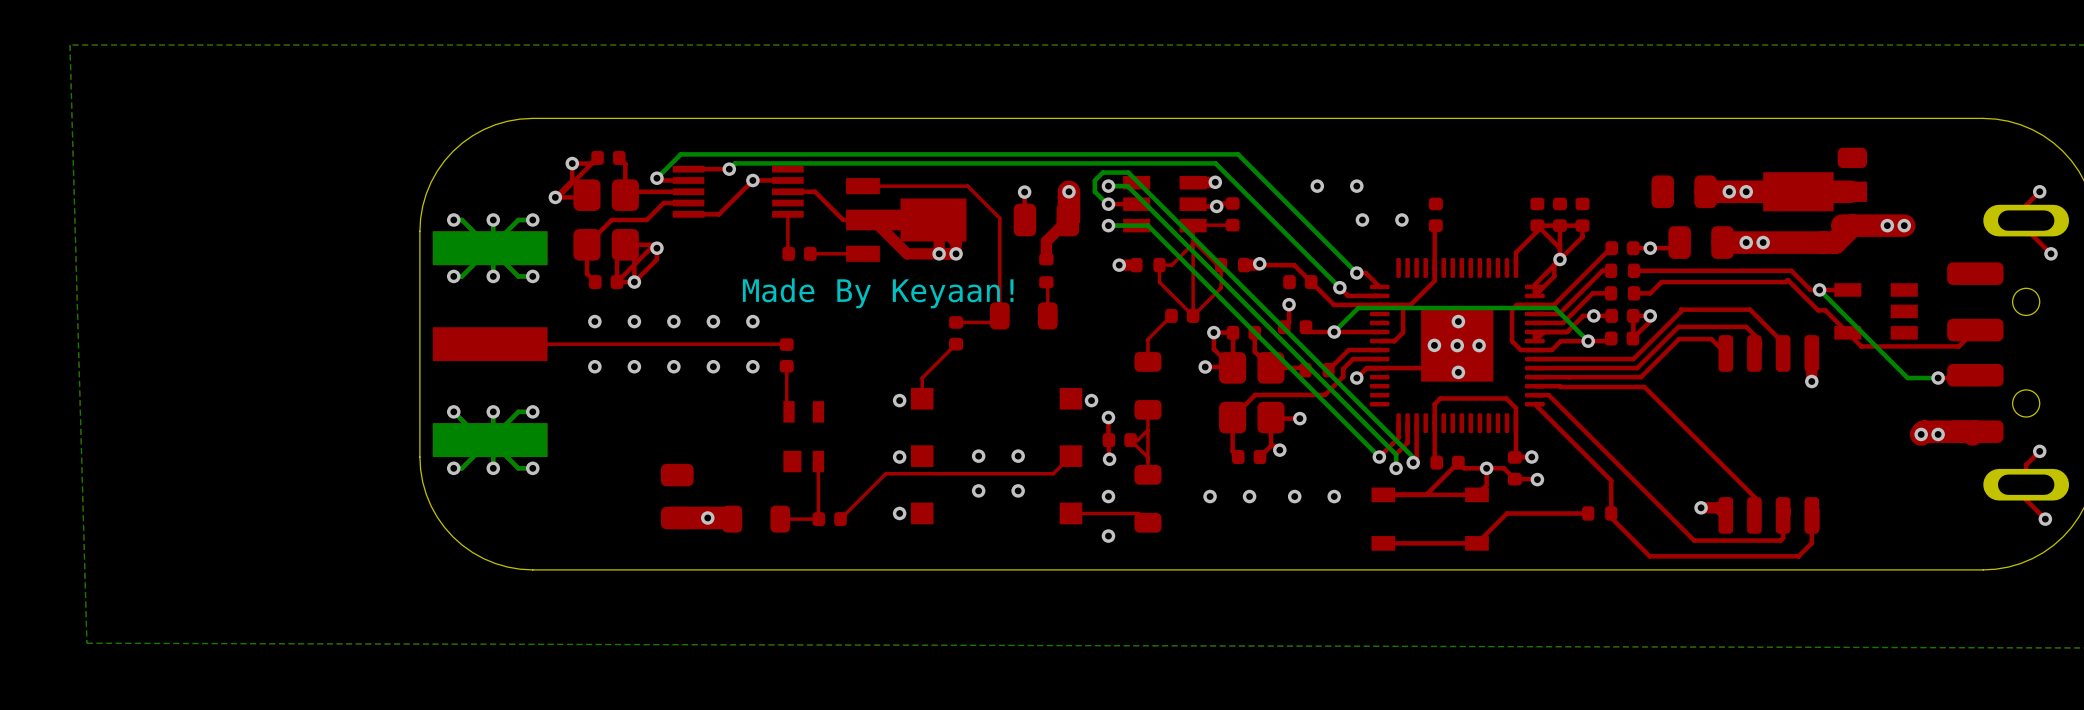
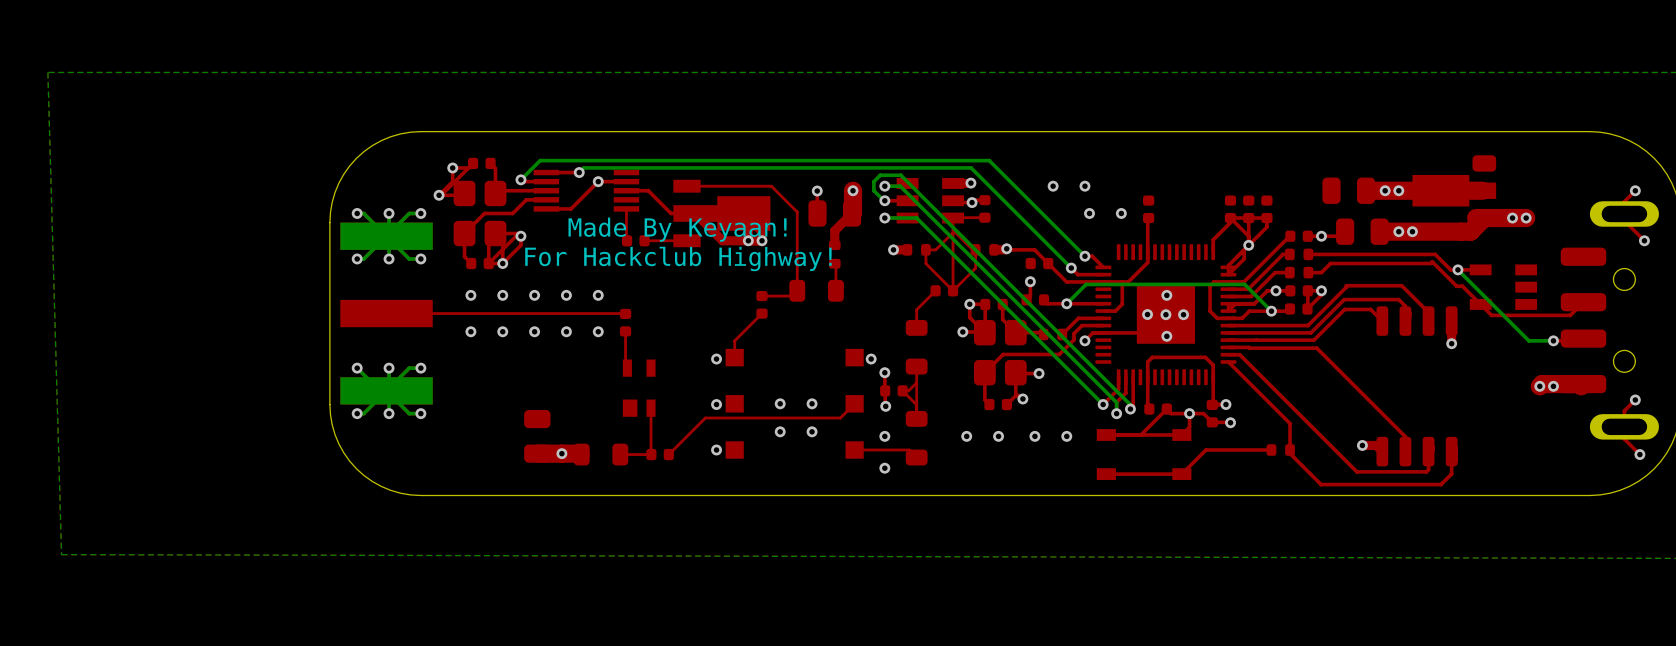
text: none -> For Hackclub Highway! (678, 258)
text position: Made By Keyaan! (878, 293) -> Made By Keyaan! (677, 229)

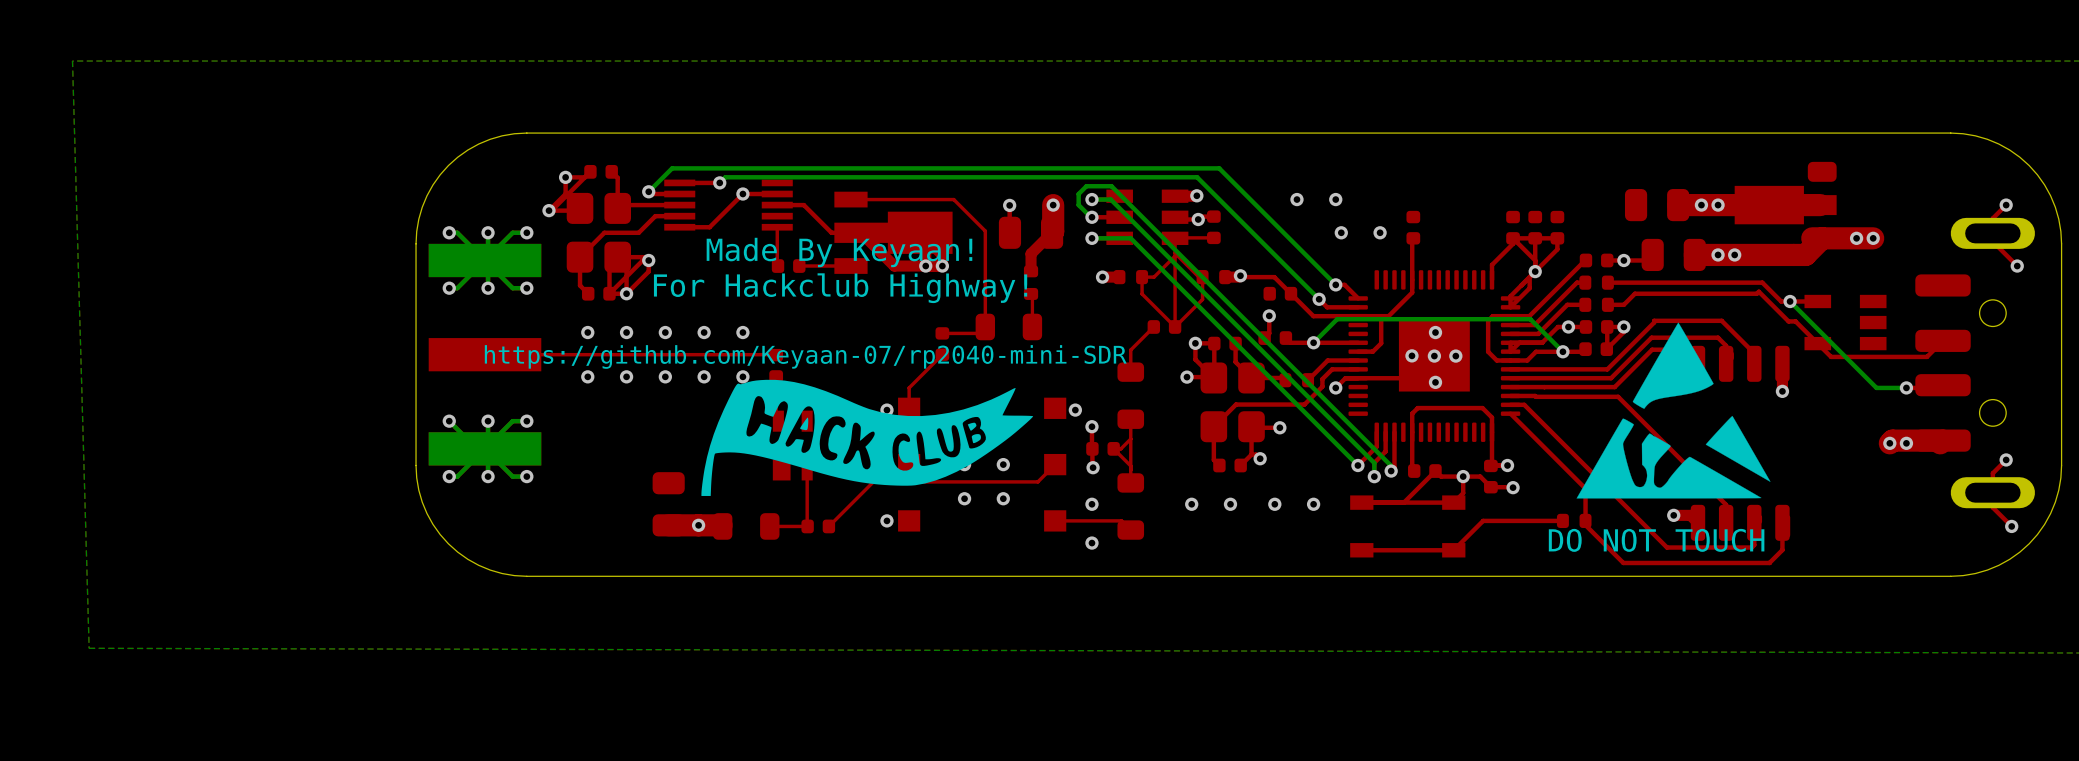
drawing: none -> [1576, 322, 1771, 499]
text: none -> https://github.com/Keyaan-07/rp2040-mini-SDR (805, 356)
drawing: none -> [701, 379, 1034, 496]
text: none -> DO NOT TOUCH (1656, 540)

